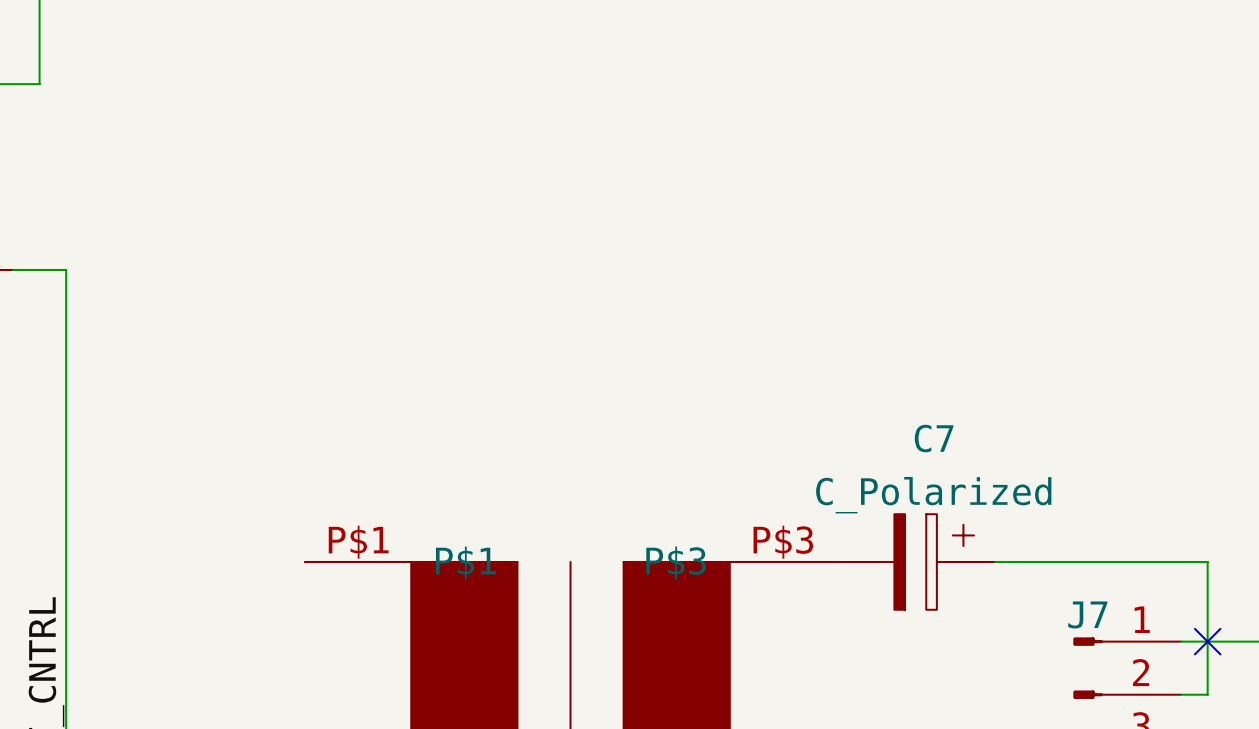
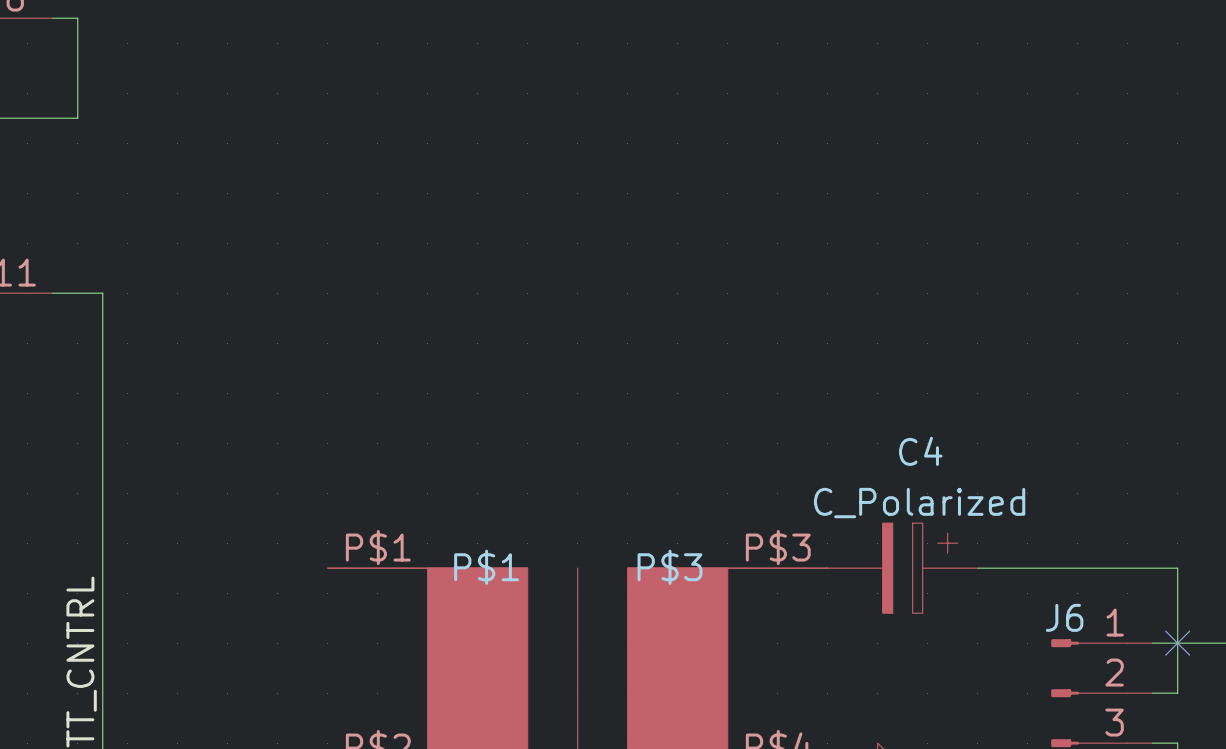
C7 name: C7 (934, 438) -> C4 (920, 451)
J7 name: J7 (1087, 614) -> J6 (1064, 617)

